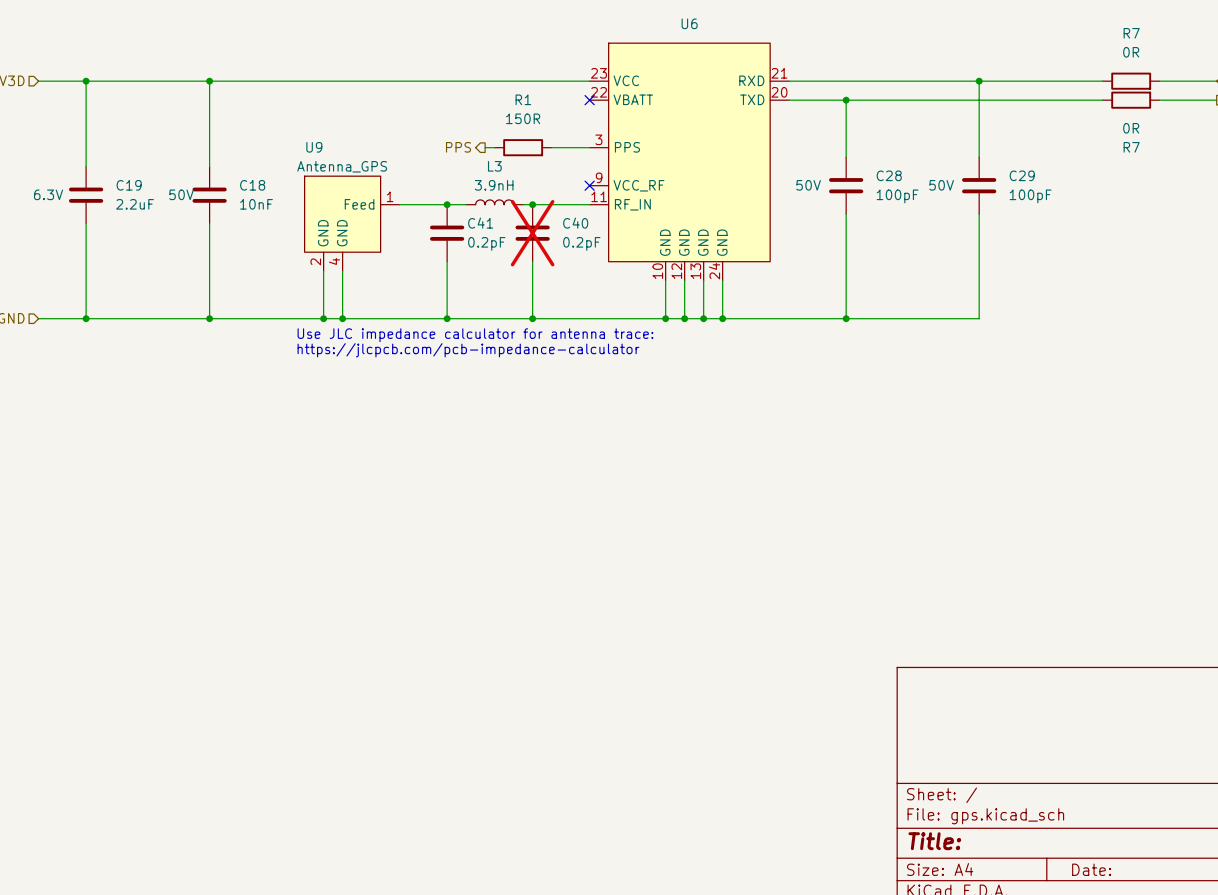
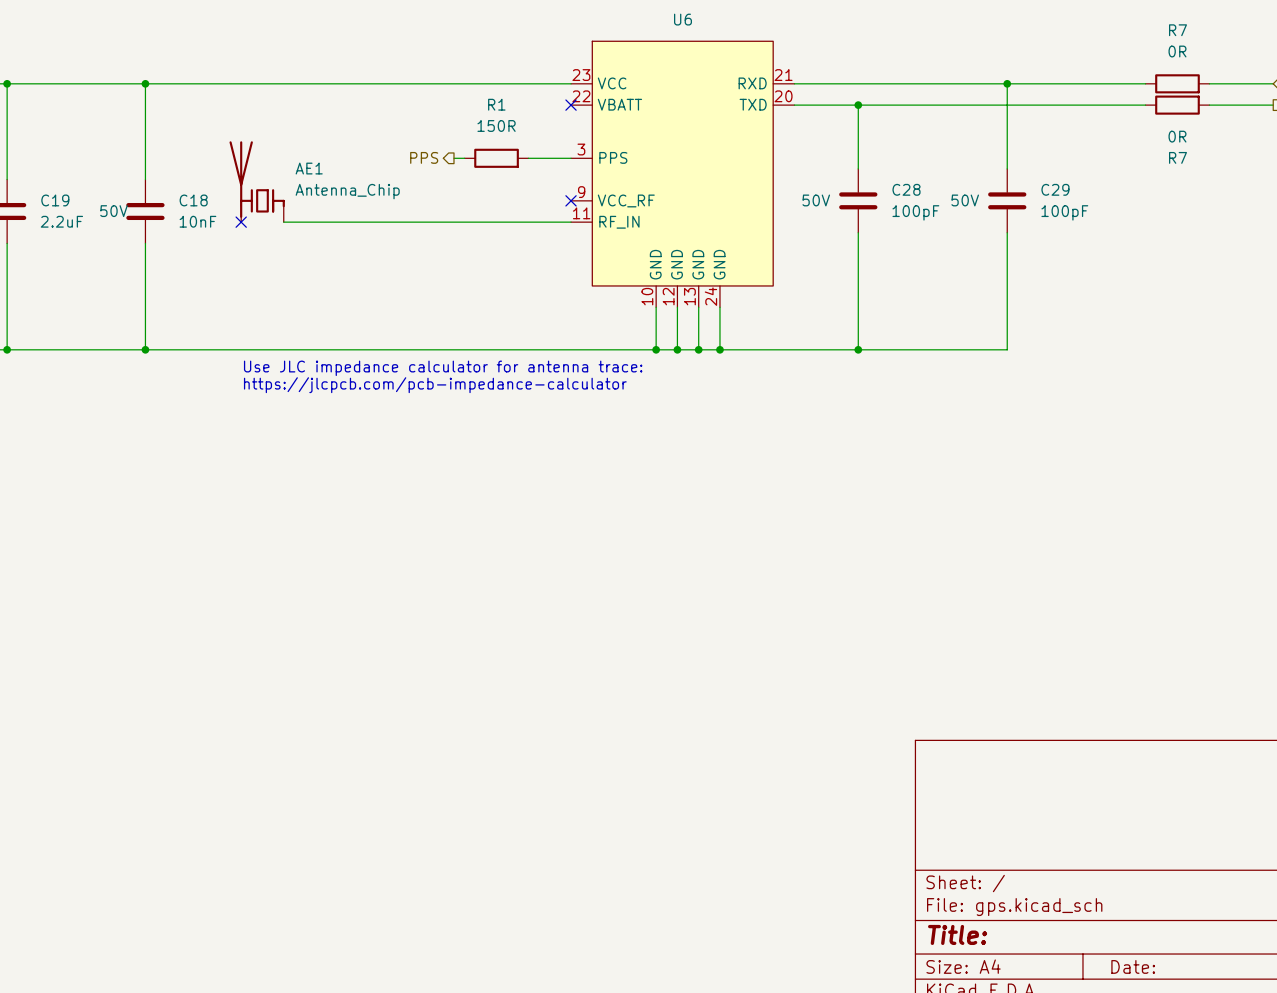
AE1: none -> Antenna_Chip (257, 181)
L3: 3.9nH (494, 202) -> none
no-connect mark: none -> (241, 222)
junction: (447, 204) -> none
wire: none -> (432, 222) (496, 222)
junction: (532, 204) -> none
U9: Antenna_GPS (352, 223) -> none
C41: 0.2pF (447, 233) -> none
C40: 0.2pF (532, 233) -> none
wire: (447, 261) (447, 318) -> none
wire: (532, 261) (532, 318) -> none
wire: (323, 271) (323, 318) -> none
wire: (342, 271) (342, 318) -> none
junction: (323, 318) -> none
junction: (342, 318) -> none
junction: (447, 318) -> none
junction: (532, 318) -> none

